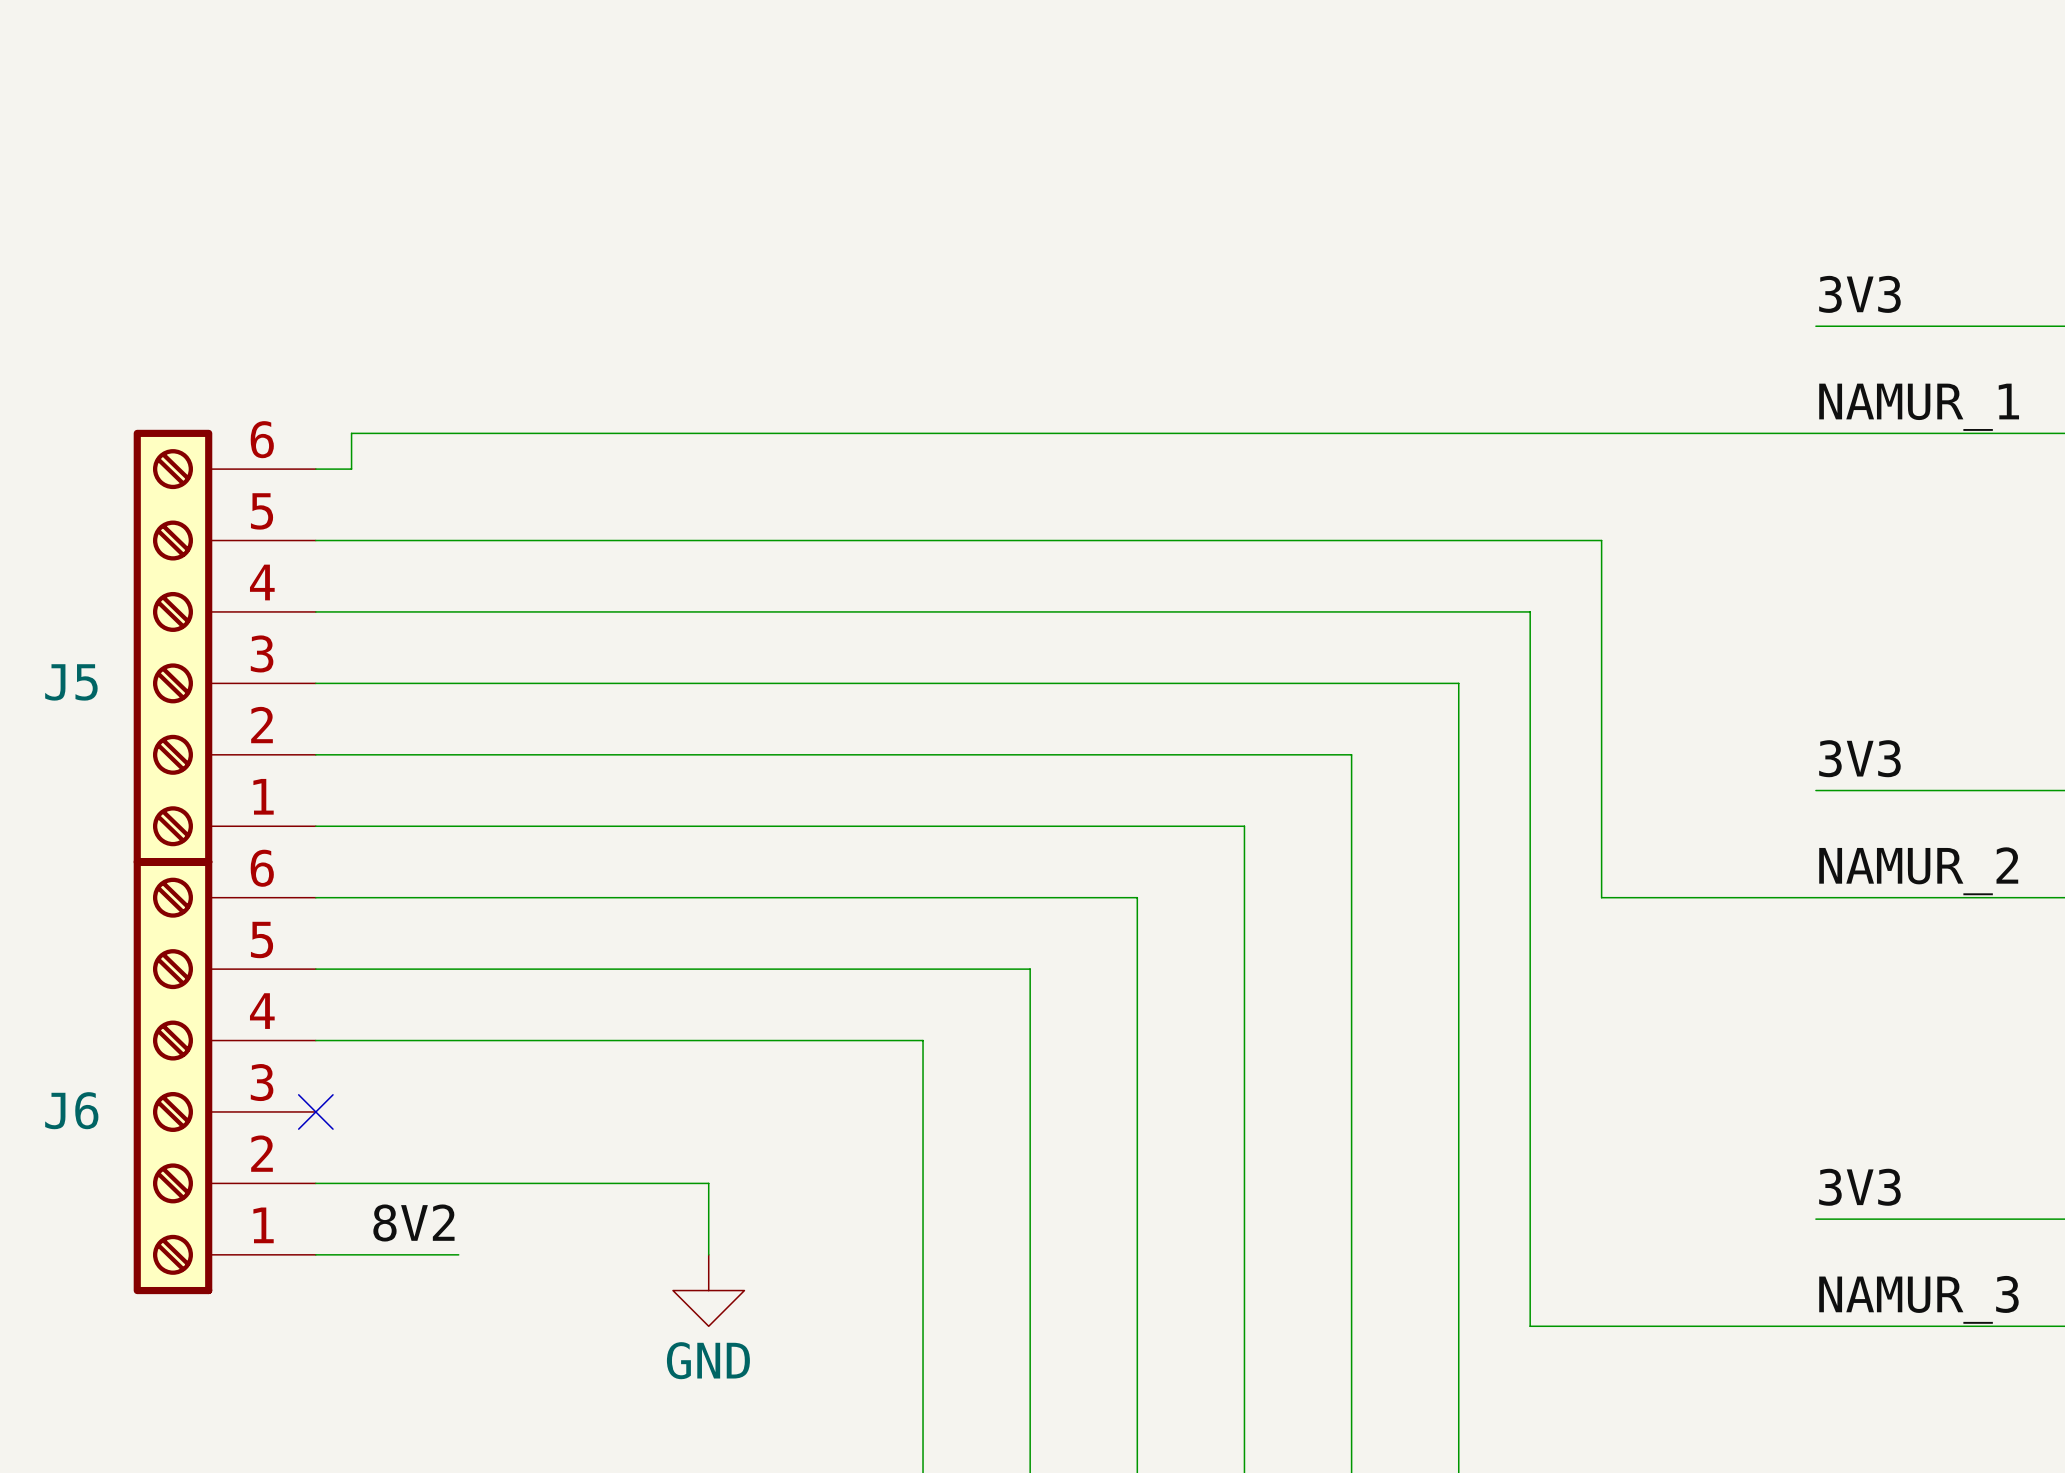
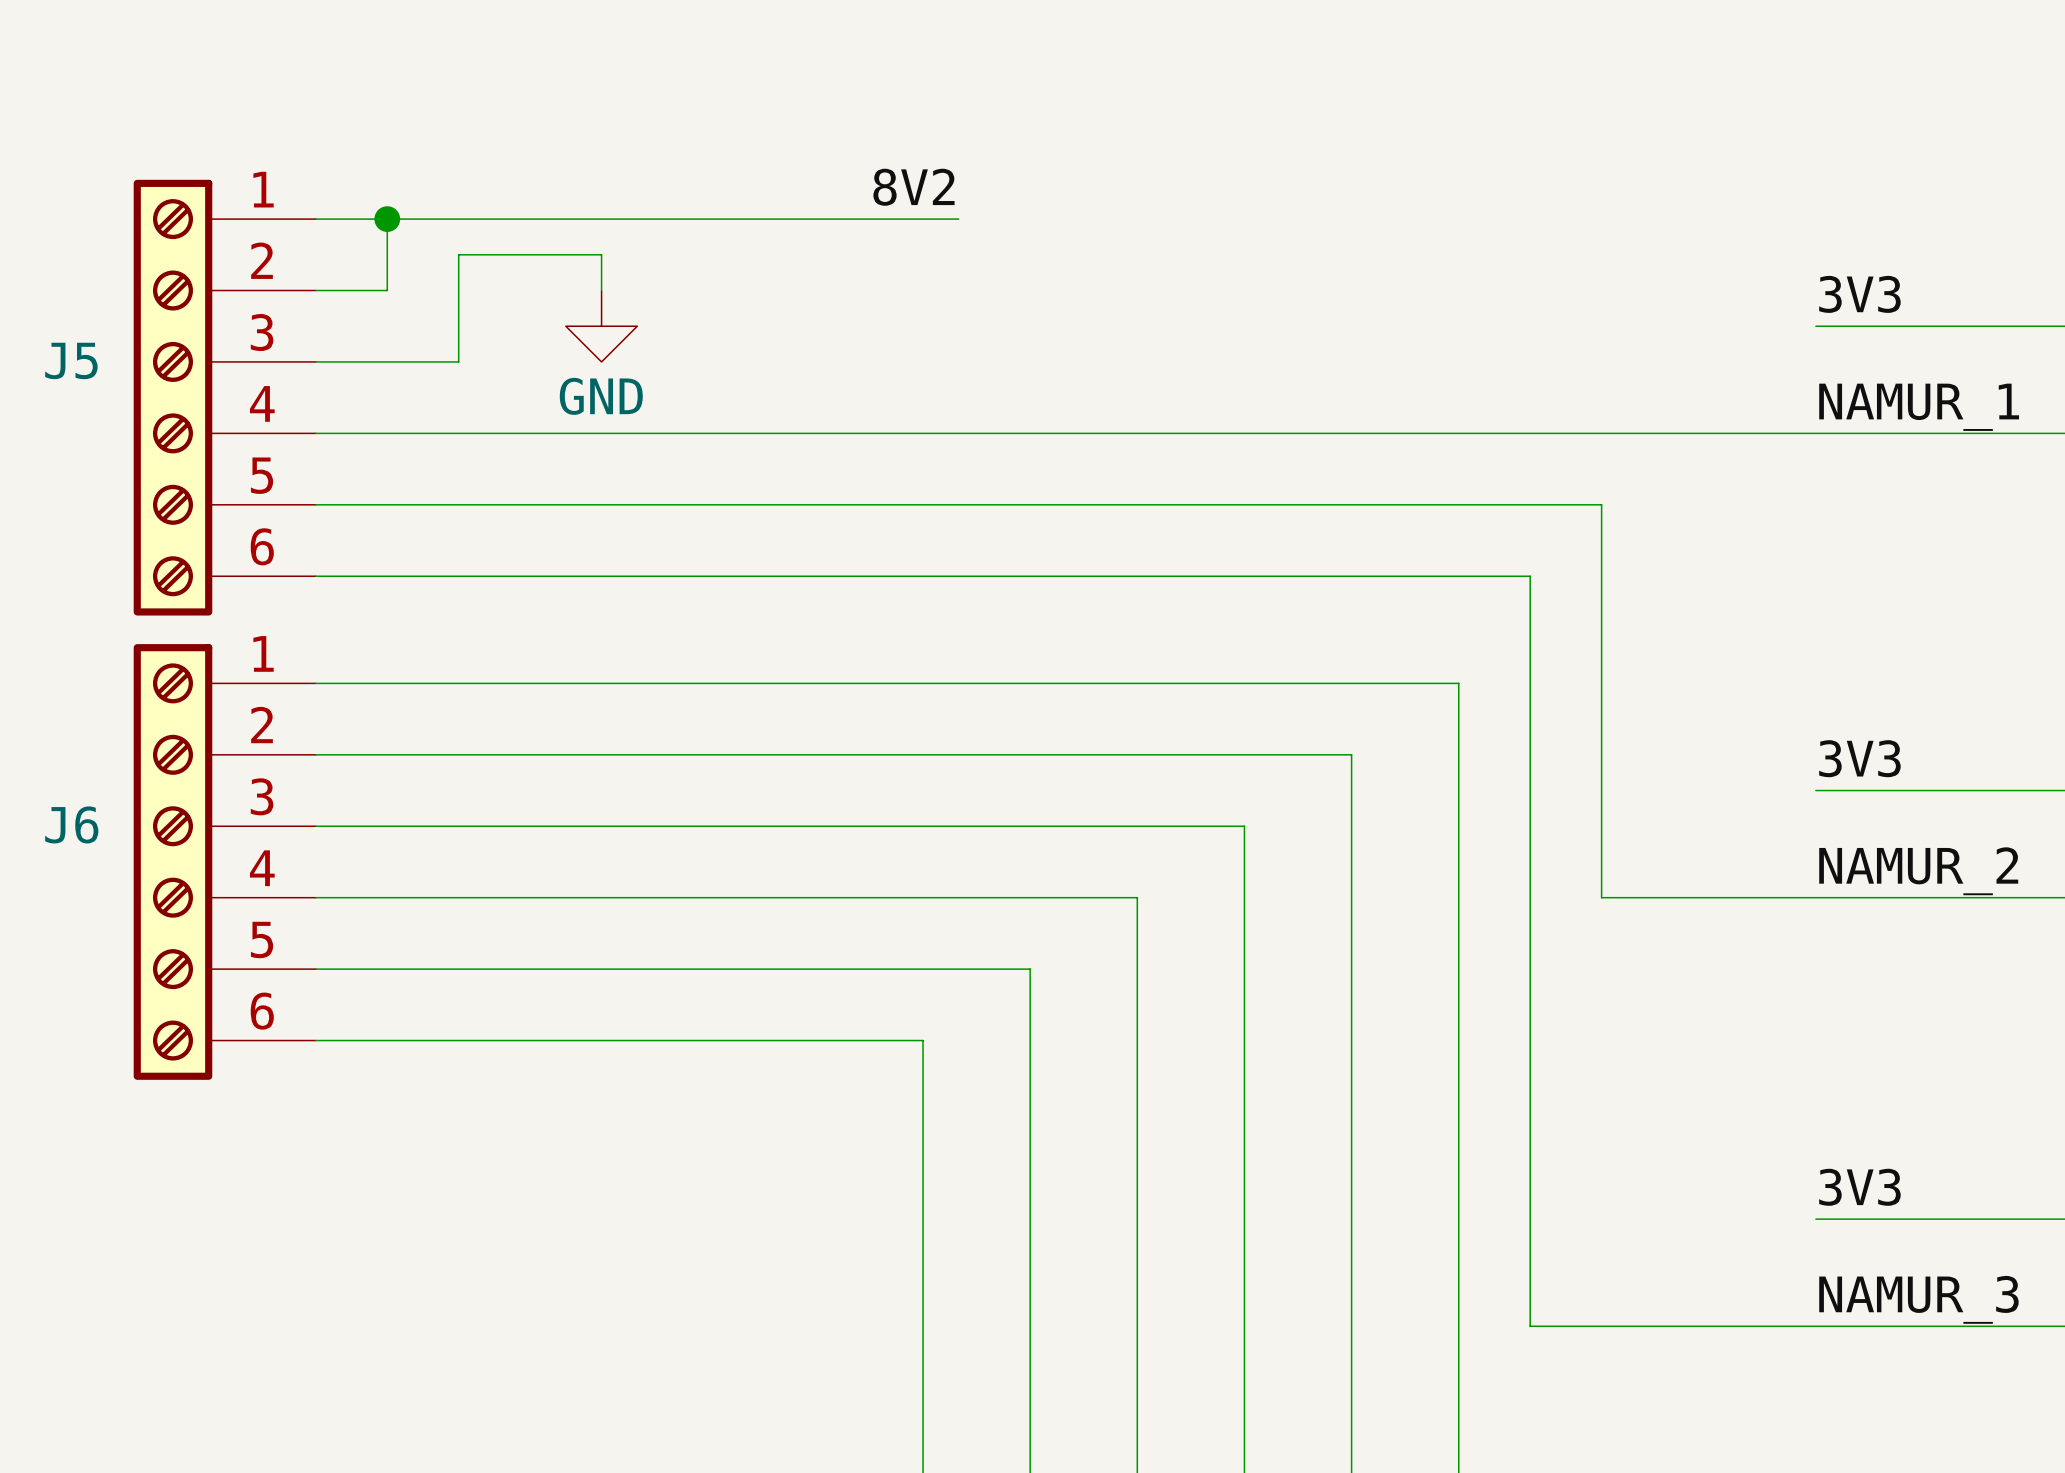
label: none -> 8V2 (913, 187)
wire: none -> (315, 219) (958, 219)
wire: none -> (387, 219) (387, 290) (315, 290)
junction: none -> (387, 219)
wire: none -> (601, 290) (601, 254) (458, 254) (458, 361) (315, 361)
power symbol: none -> GND (601, 326)
wire: (351, 433) (351, 469) (315, 469) -> (351, 433) (315, 433)
wire: (315, 540) (1601, 540) -> (315, 504) (1601, 504) (1601, 540)
wire: (315, 611) (1530, 611) -> (315, 576) (1530, 576) (1530, 611)
J5 flip: as is (172, 647) -> up-down (172, 397)
J6 flip: as is (172, 1076) -> up-down (172, 861)
no-connect mark: (315, 1111) -> none
wire: (315, 1183) (708, 1183) (708, 1254) -> none
label: 8V2 (413, 1222) -> none
wire: (315, 1254) (458, 1254) -> none
power symbol: GND (708, 1290) -> none

